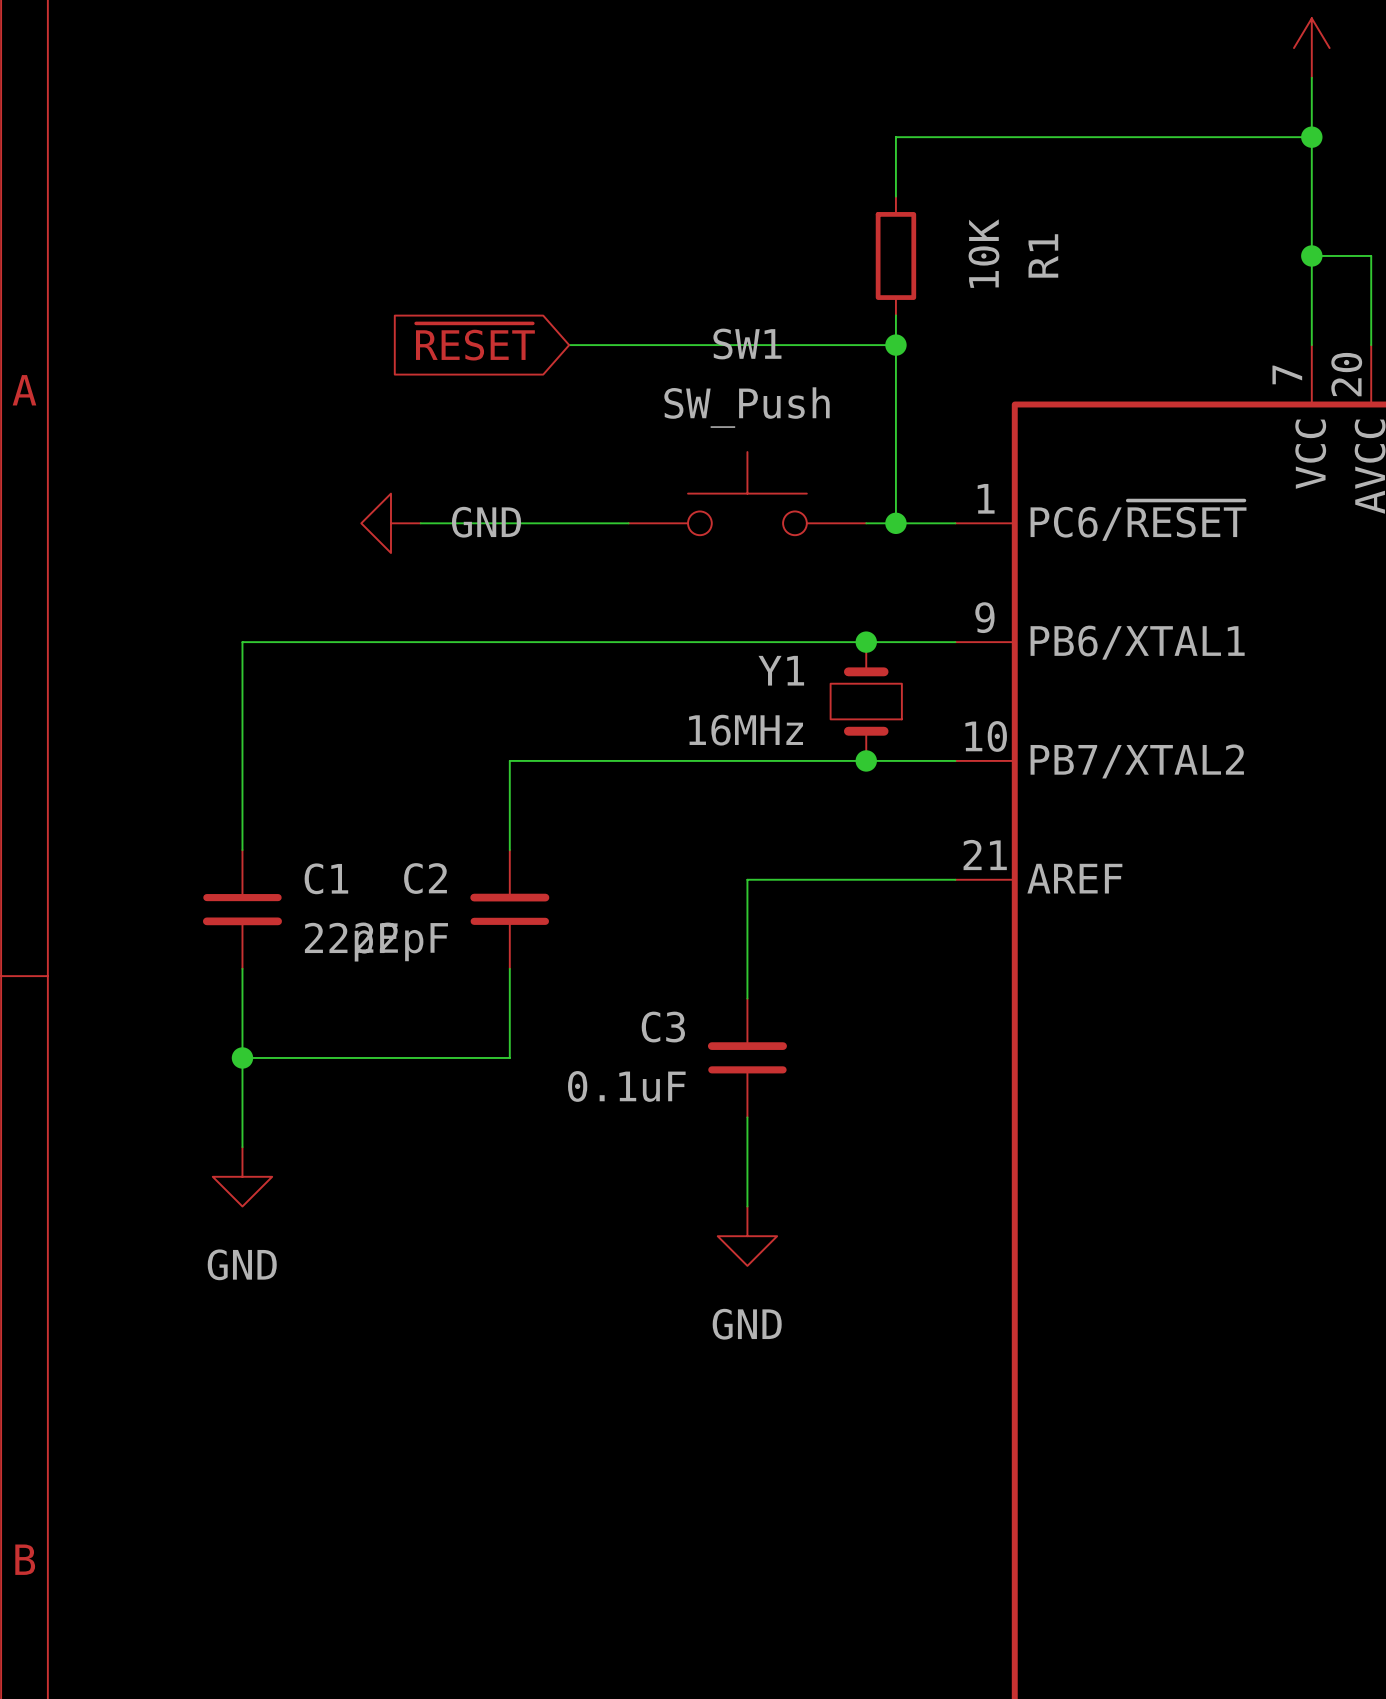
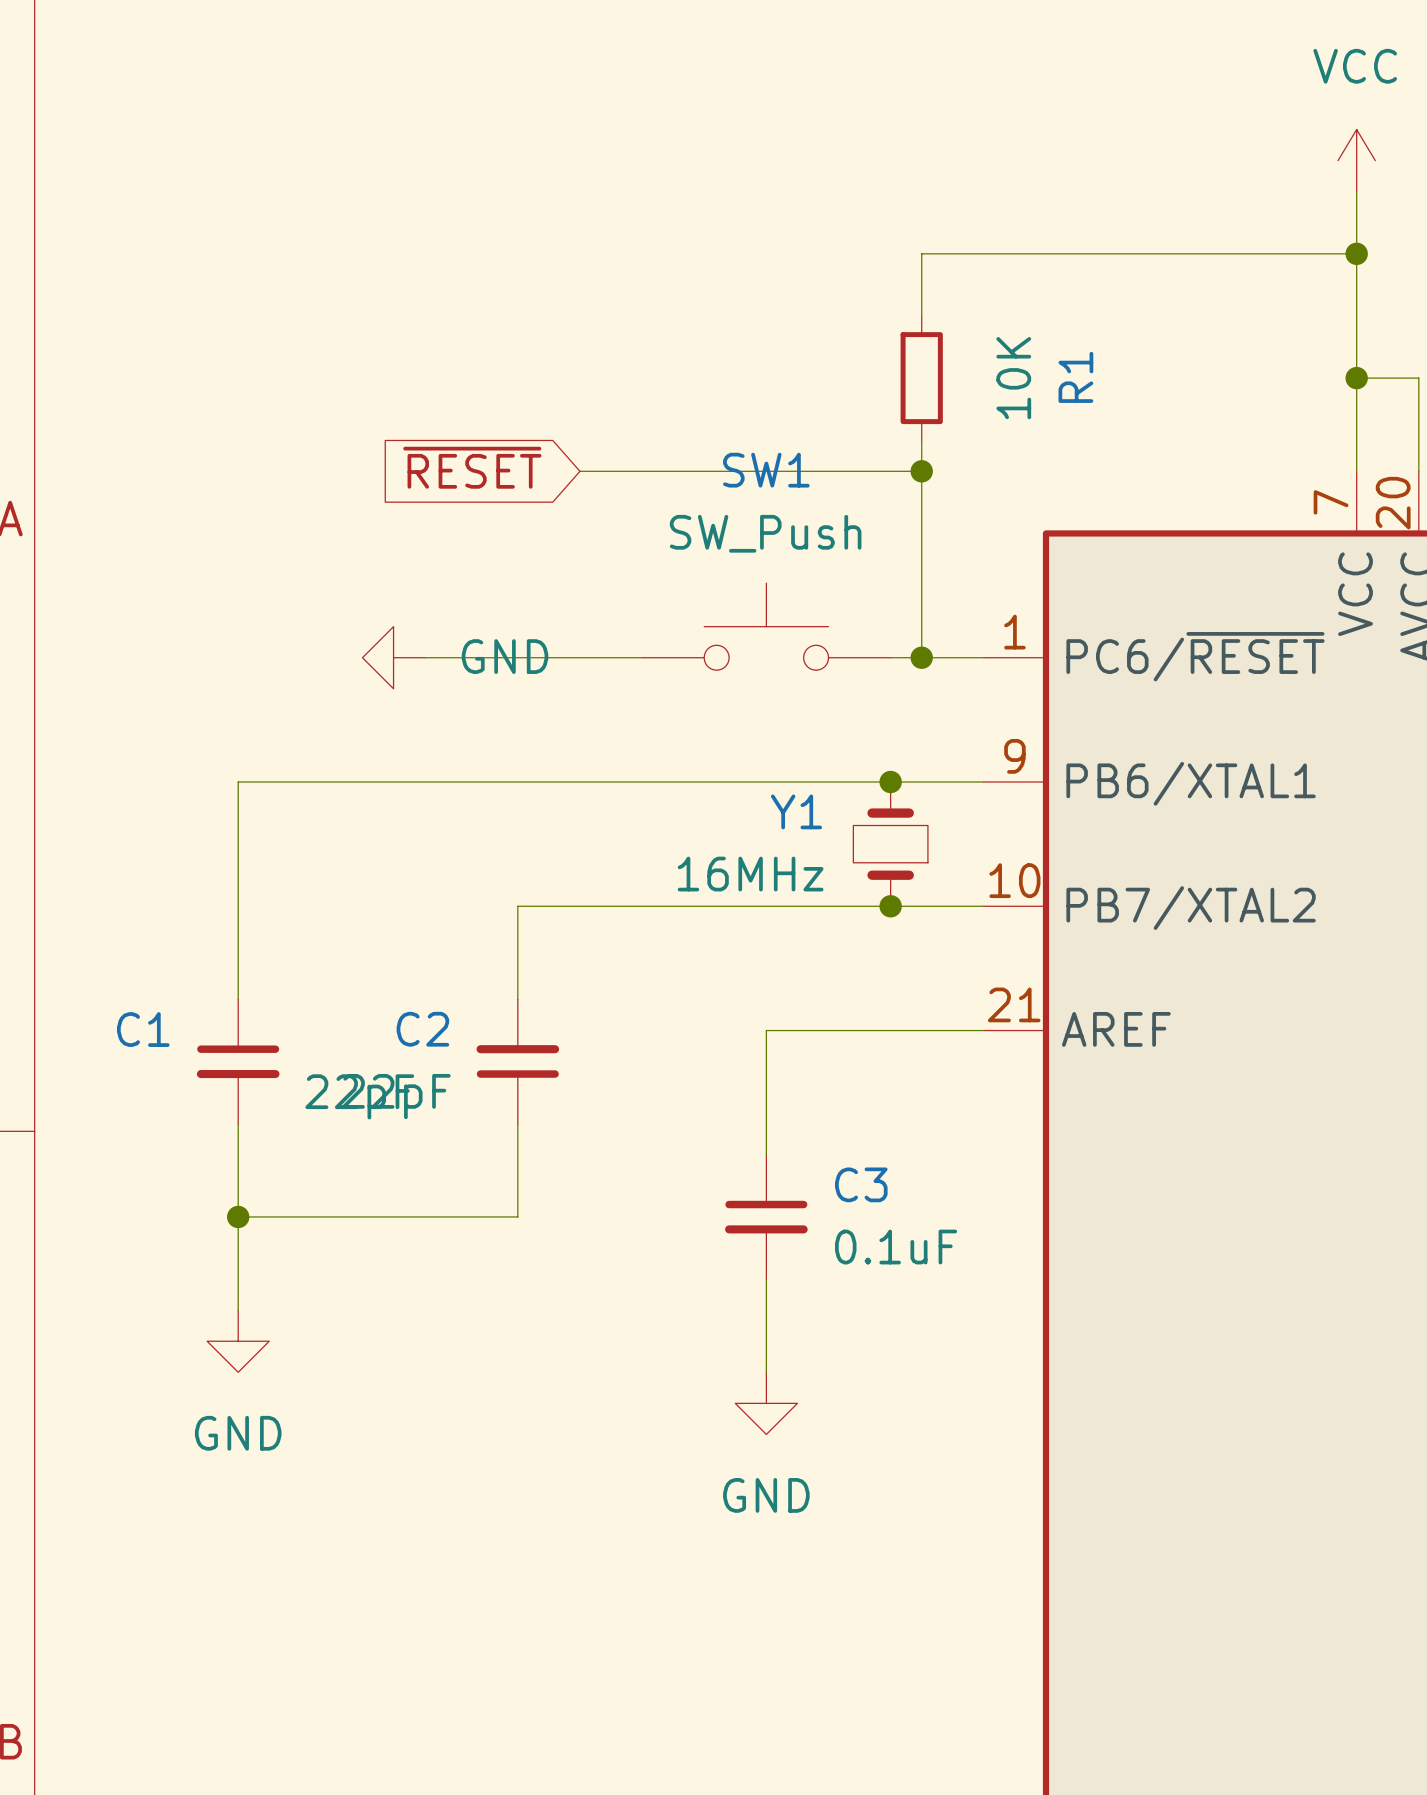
C1 name position: C1 (326, 878) -> C1 (143, 1029)
C3 name position: C3 (663, 1027) -> C3 (861, 1184)
C3 rotation: 0° (747, 1057) -> 180° (766, 1217)
C3 value position: 0.1uF (626, 1086) -> 0.1uF (896, 1247)

